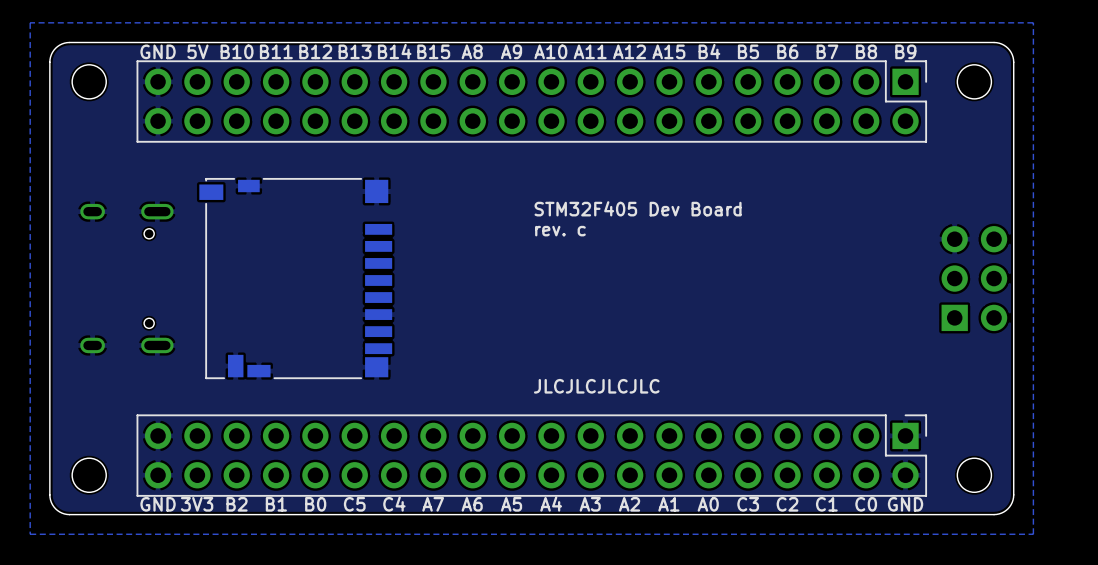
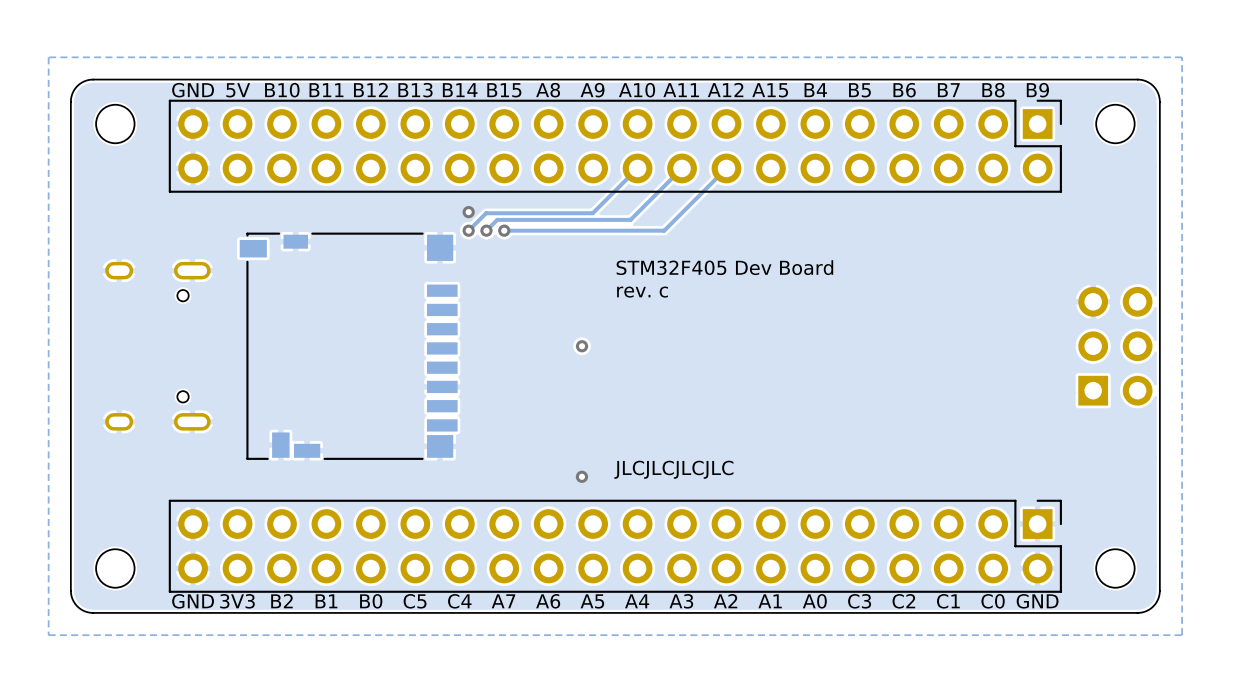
track: none -> (637, 168) (592, 213) (486, 213) (468, 230)
track: none -> (682, 168) (630, 219) (497, 219) (486, 230)
track: none -> (726, 168) (664, 230) (504, 230)
via: none -> (468, 212)
via: none -> (468, 230)
via: none -> (486, 230)
via: none -> (504, 230)
via: none -> (582, 346)
via: none -> (581, 476)

